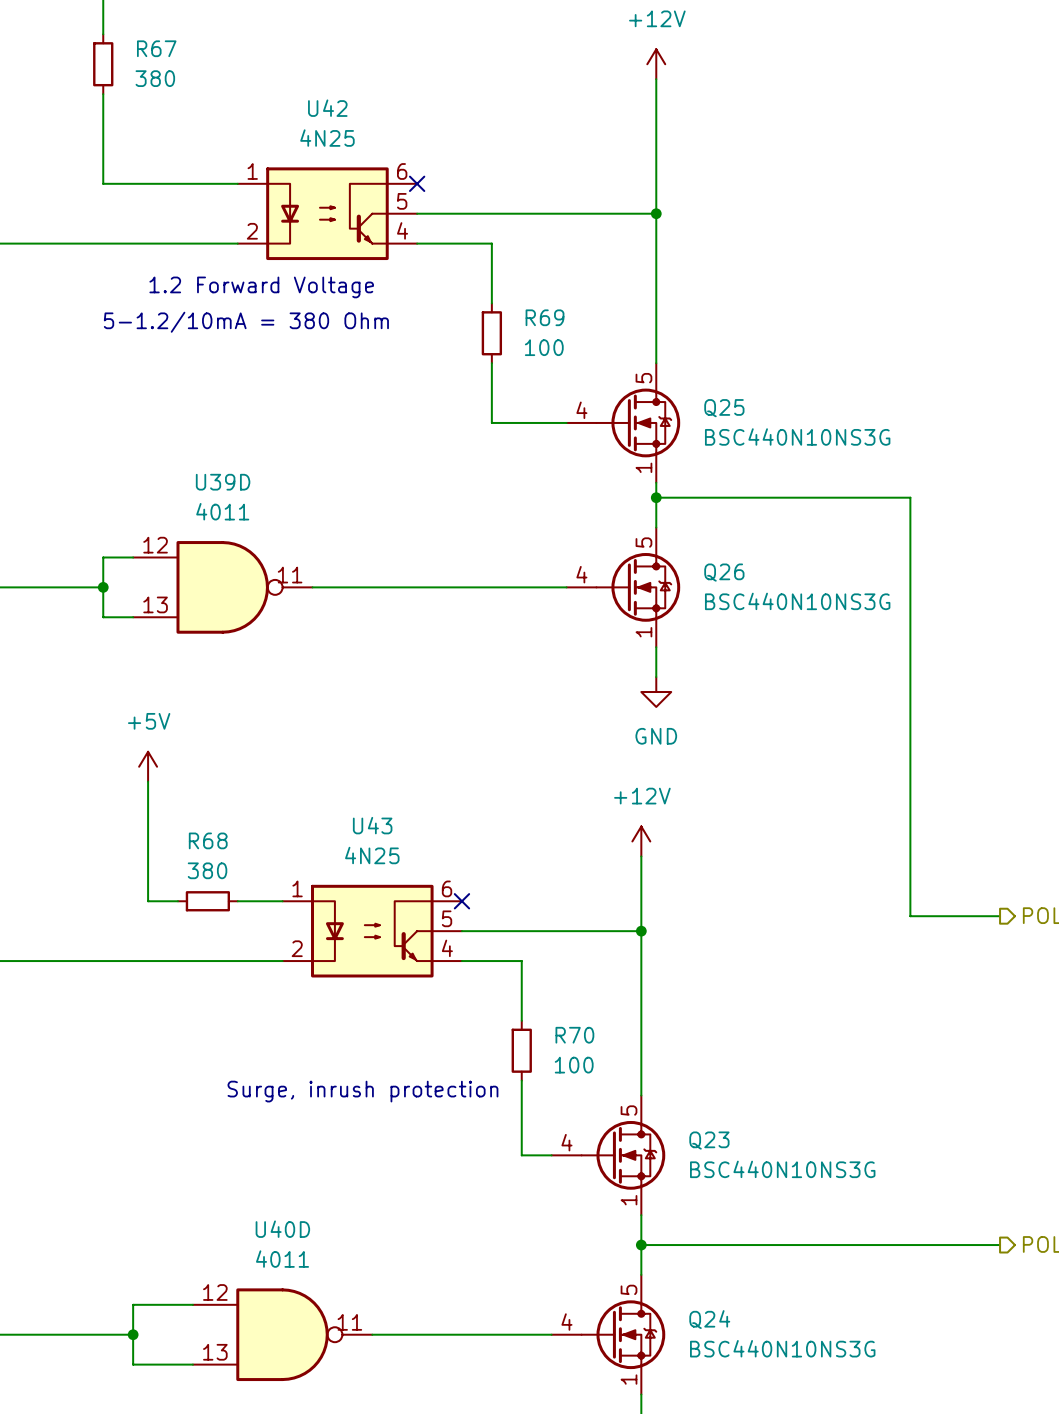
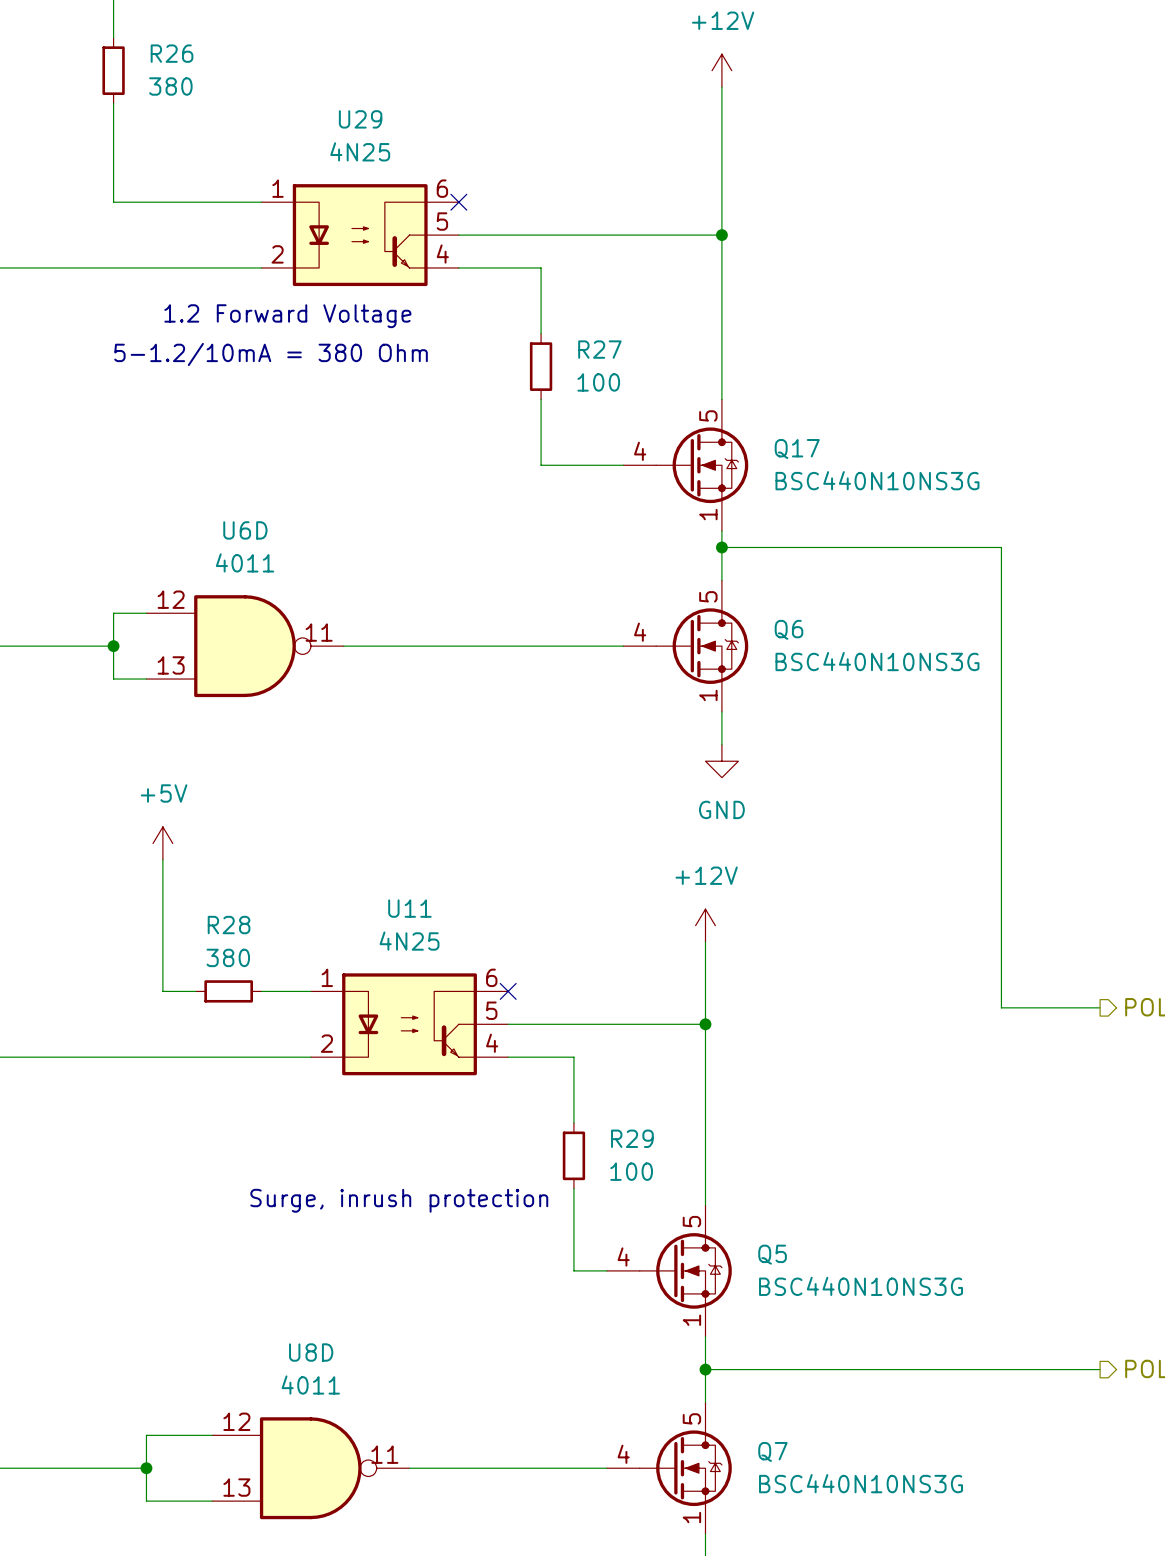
R67 name: R67 (156, 48) -> R26 (172, 53)
U42 name: U42 (327, 108) -> U29 (360, 119)
R69 name: R69 (545, 317) -> R27 (599, 349)
Q25 name: Q25 (724, 408) -> Q17 (797, 449)
U39D name: U39D (223, 482) -> U6D (245, 530)
Q26 name: Q26 (724, 572) -> Q6 (788, 629)
U43 name: U43 (372, 825) -> U11 (409, 908)
R68 name: R68 (208, 840) -> R28 (229, 925)
R70 name: R70 (574, 1035) -> R29 (632, 1138)
Q23 name: Q23 (709, 1140) -> Q5 (772, 1254)
U40D name: U40D (282, 1229) -> U8D (311, 1352)
Q24 name: Q24 (709, 1319) -> Q7 (772, 1451)

